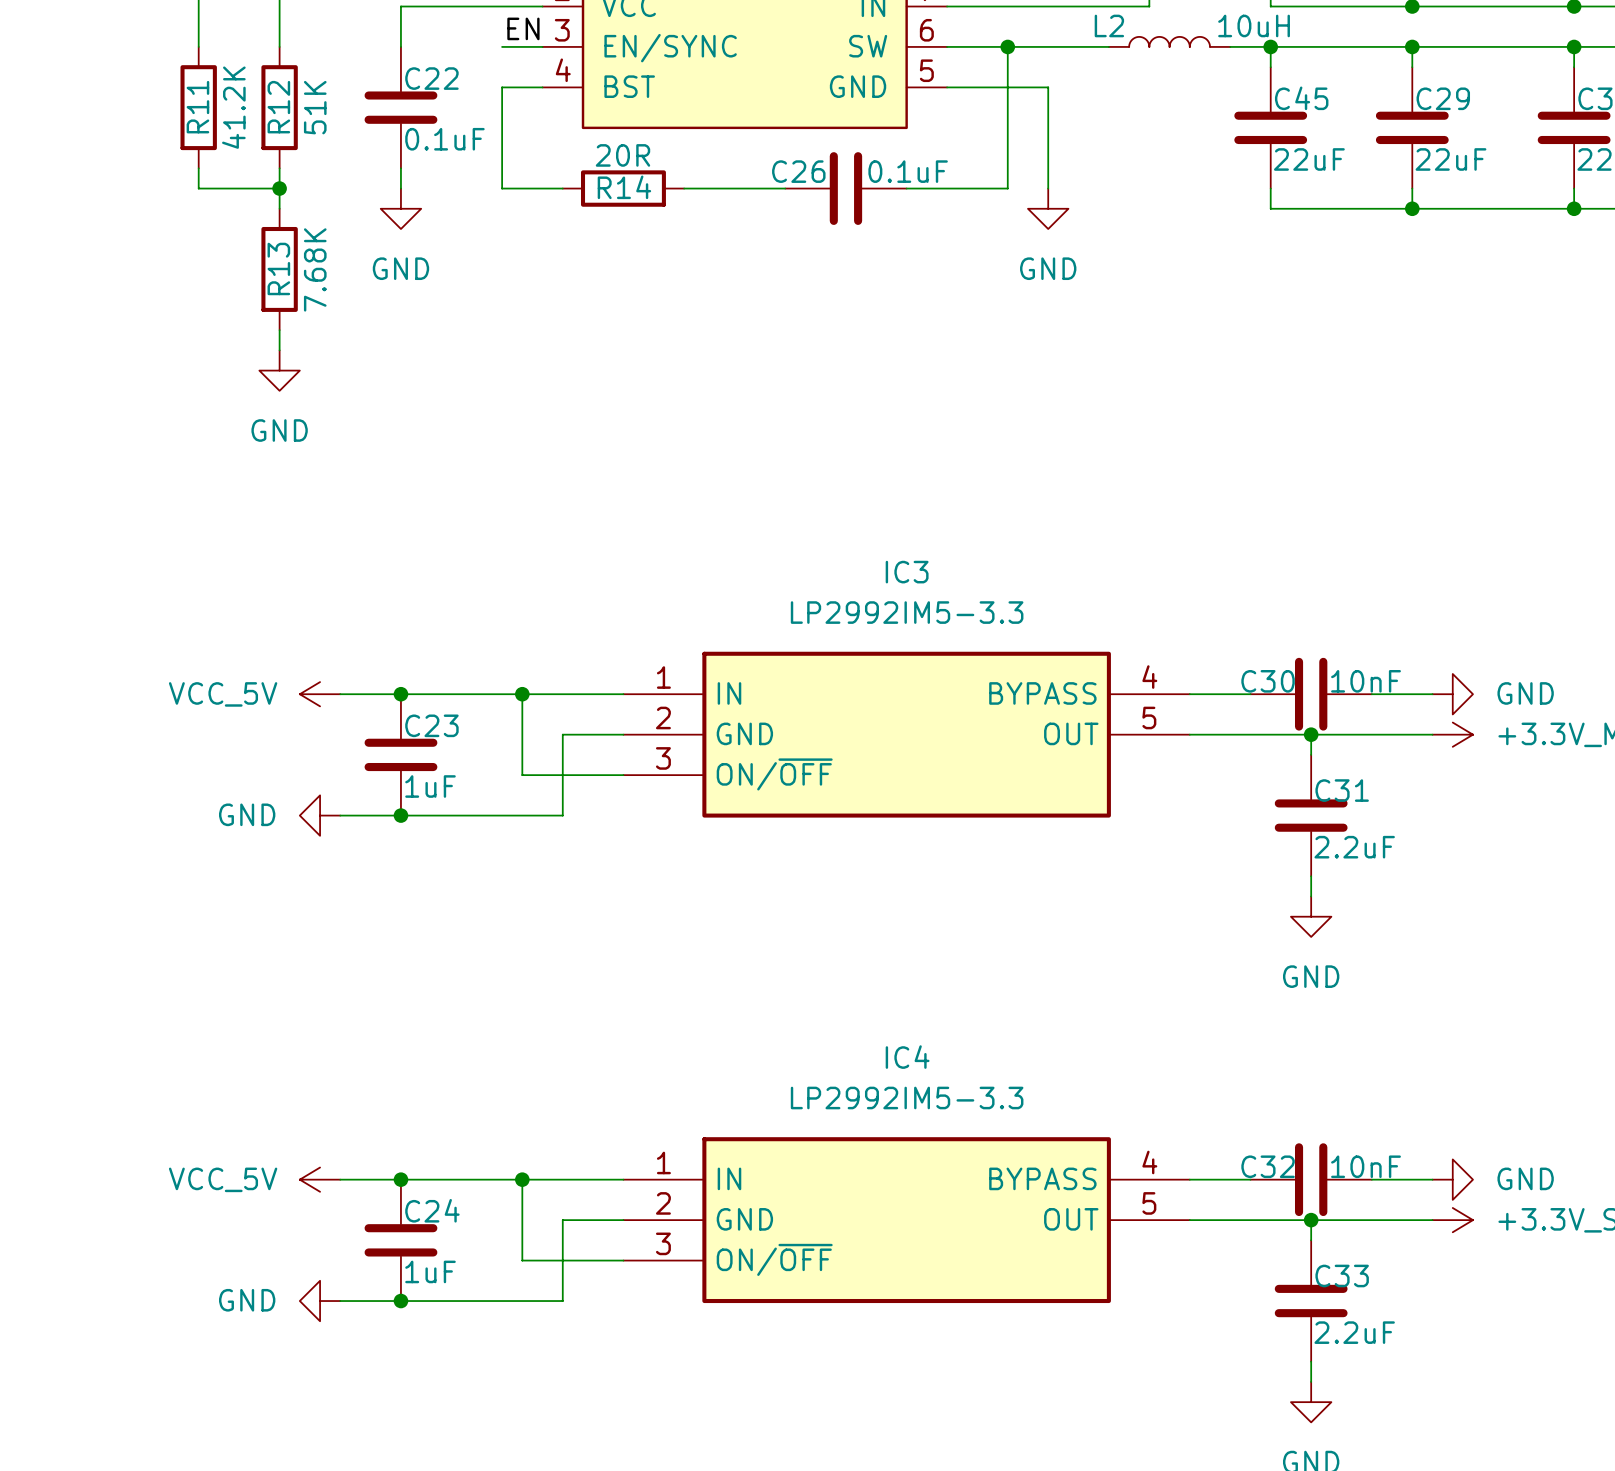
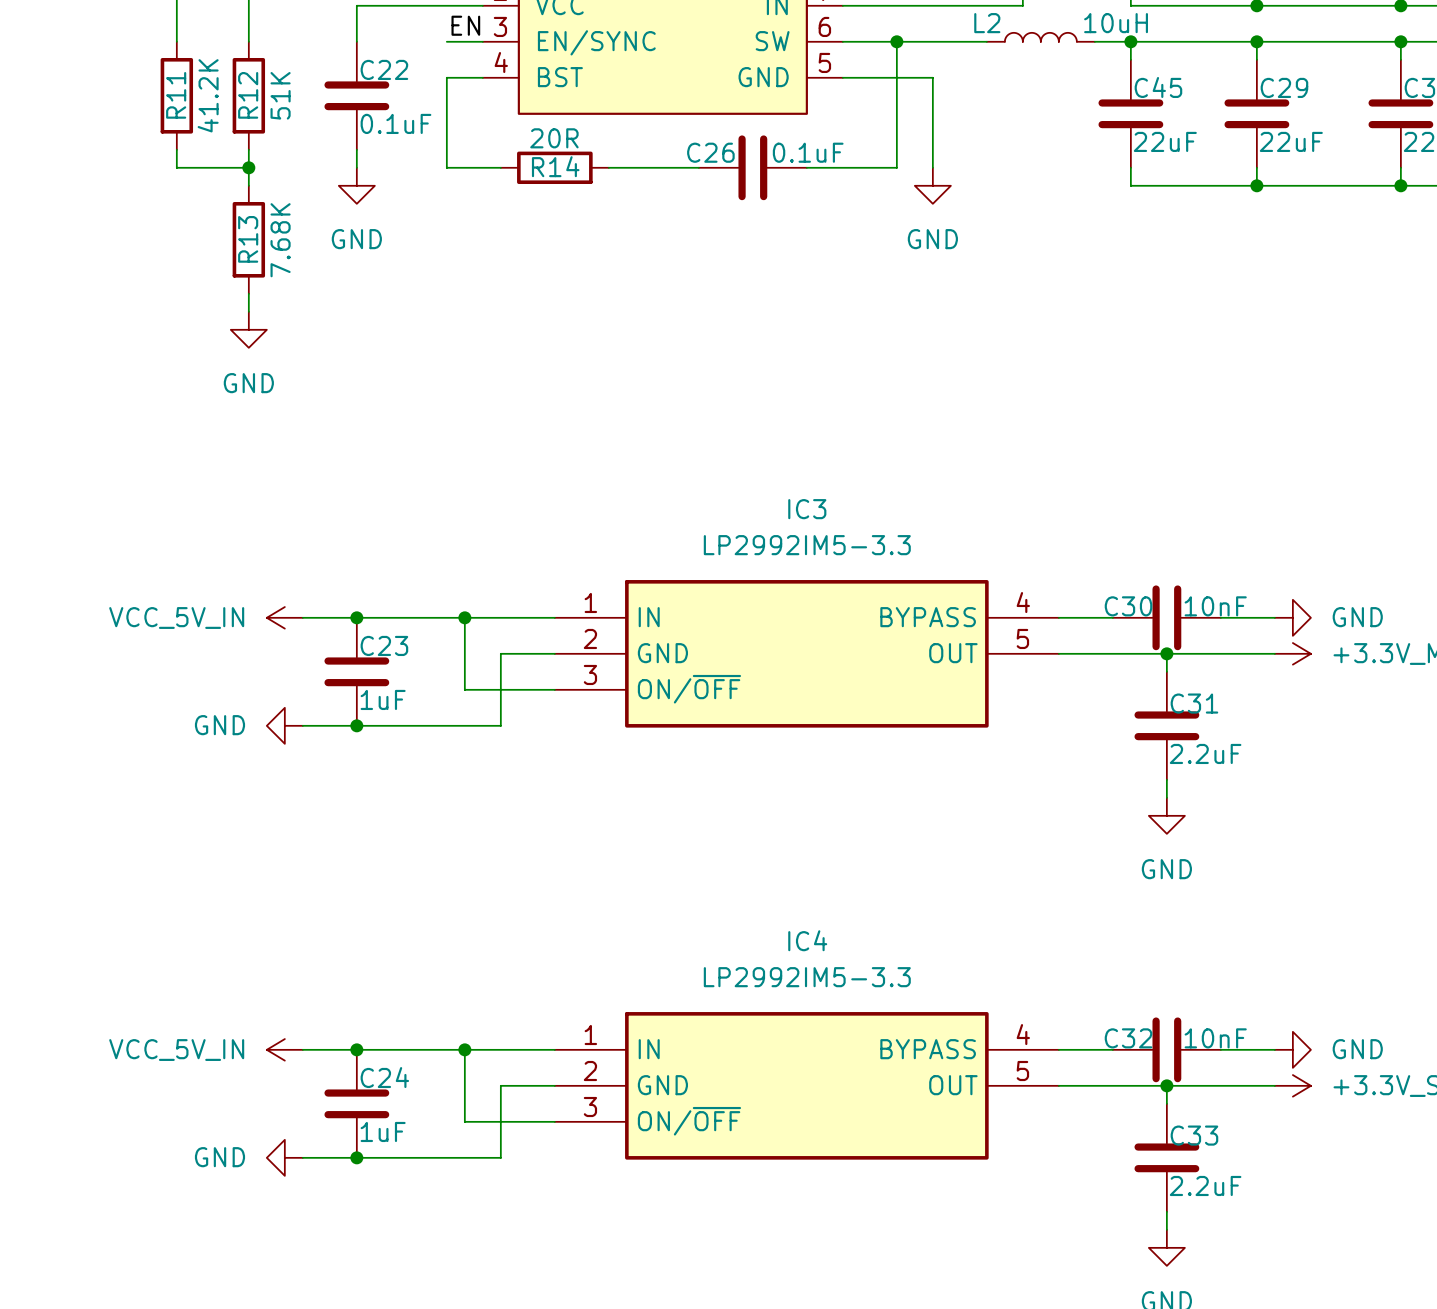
power symbol: VCC_5V (320, 694) -> VCC_5V_IN (284, 617)
power symbol: VCC_5V (320, 1179) -> VCC_5V_IN (284, 1049)

